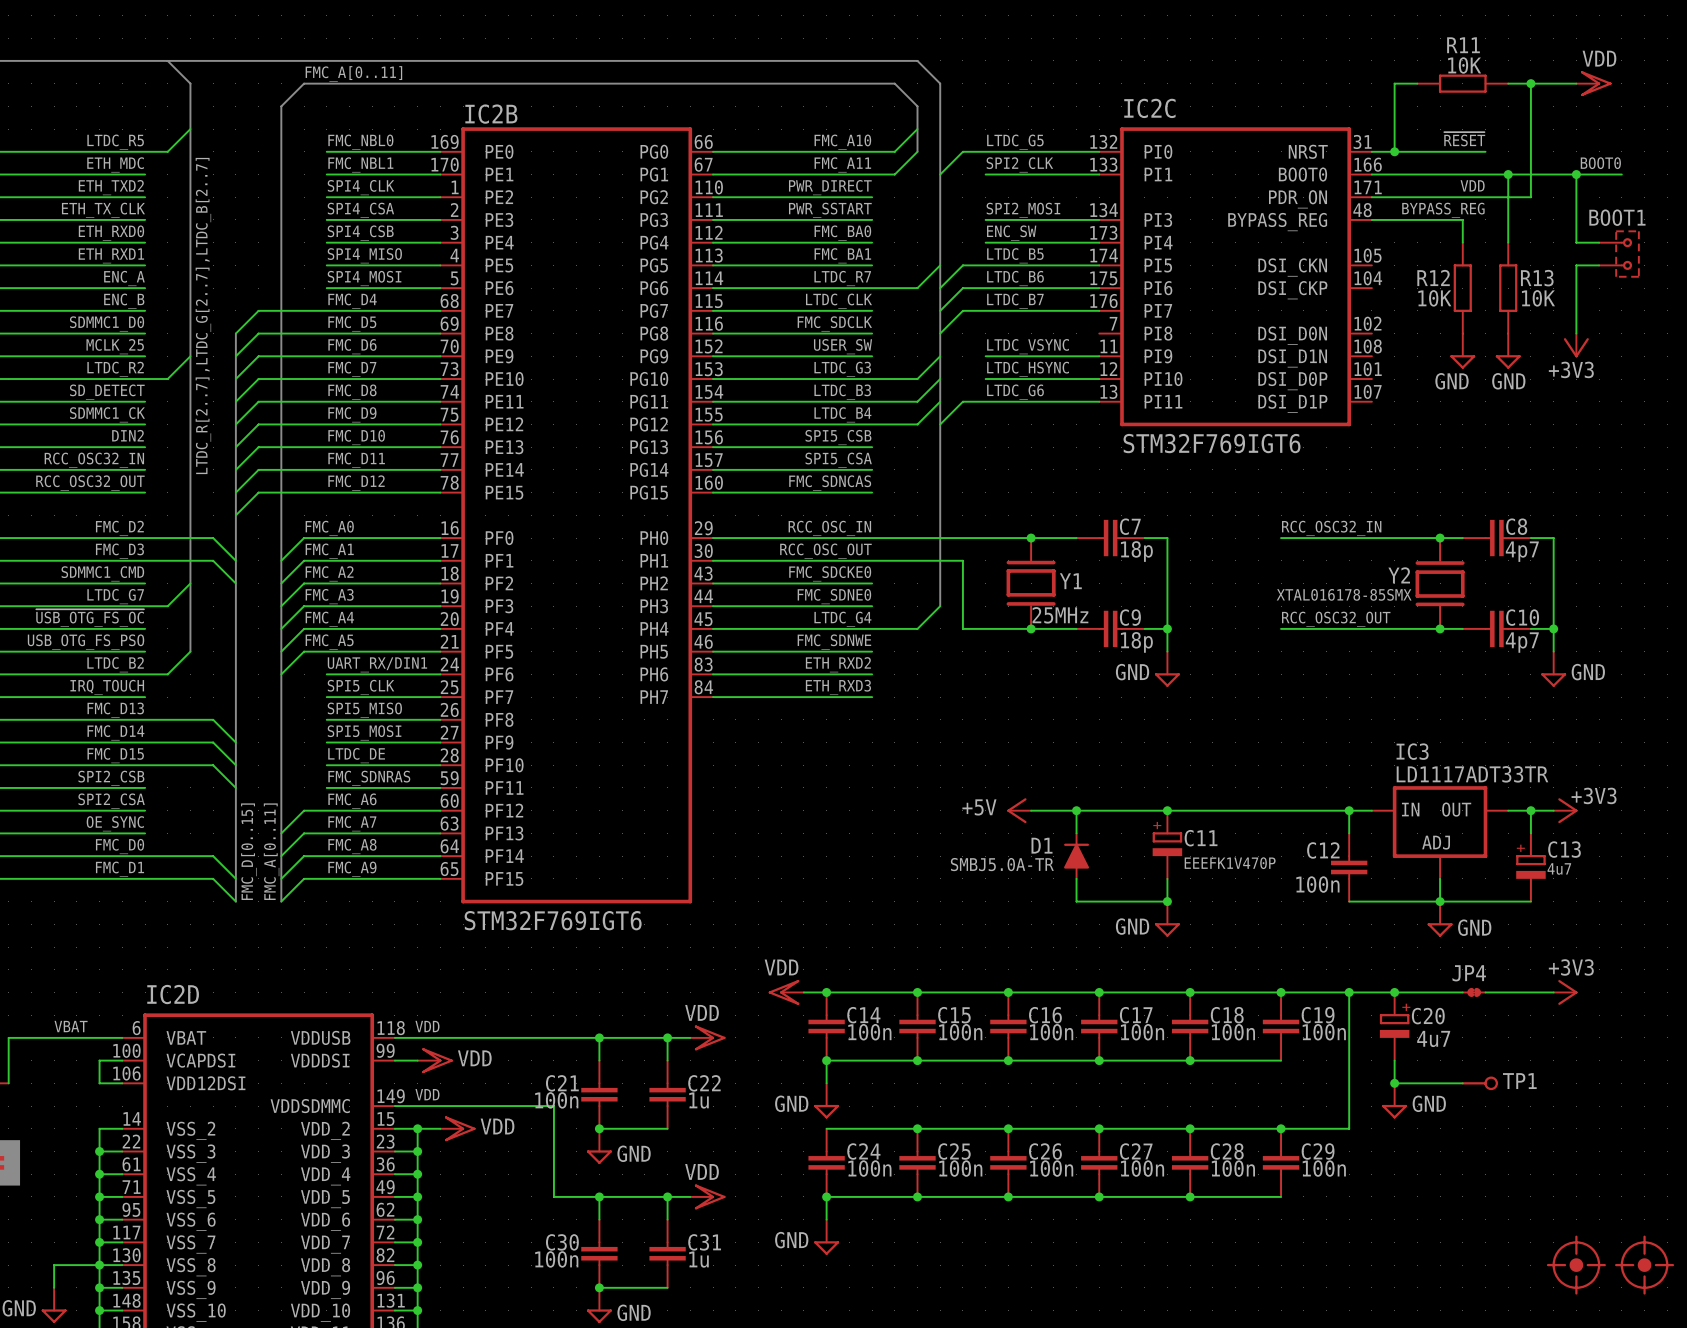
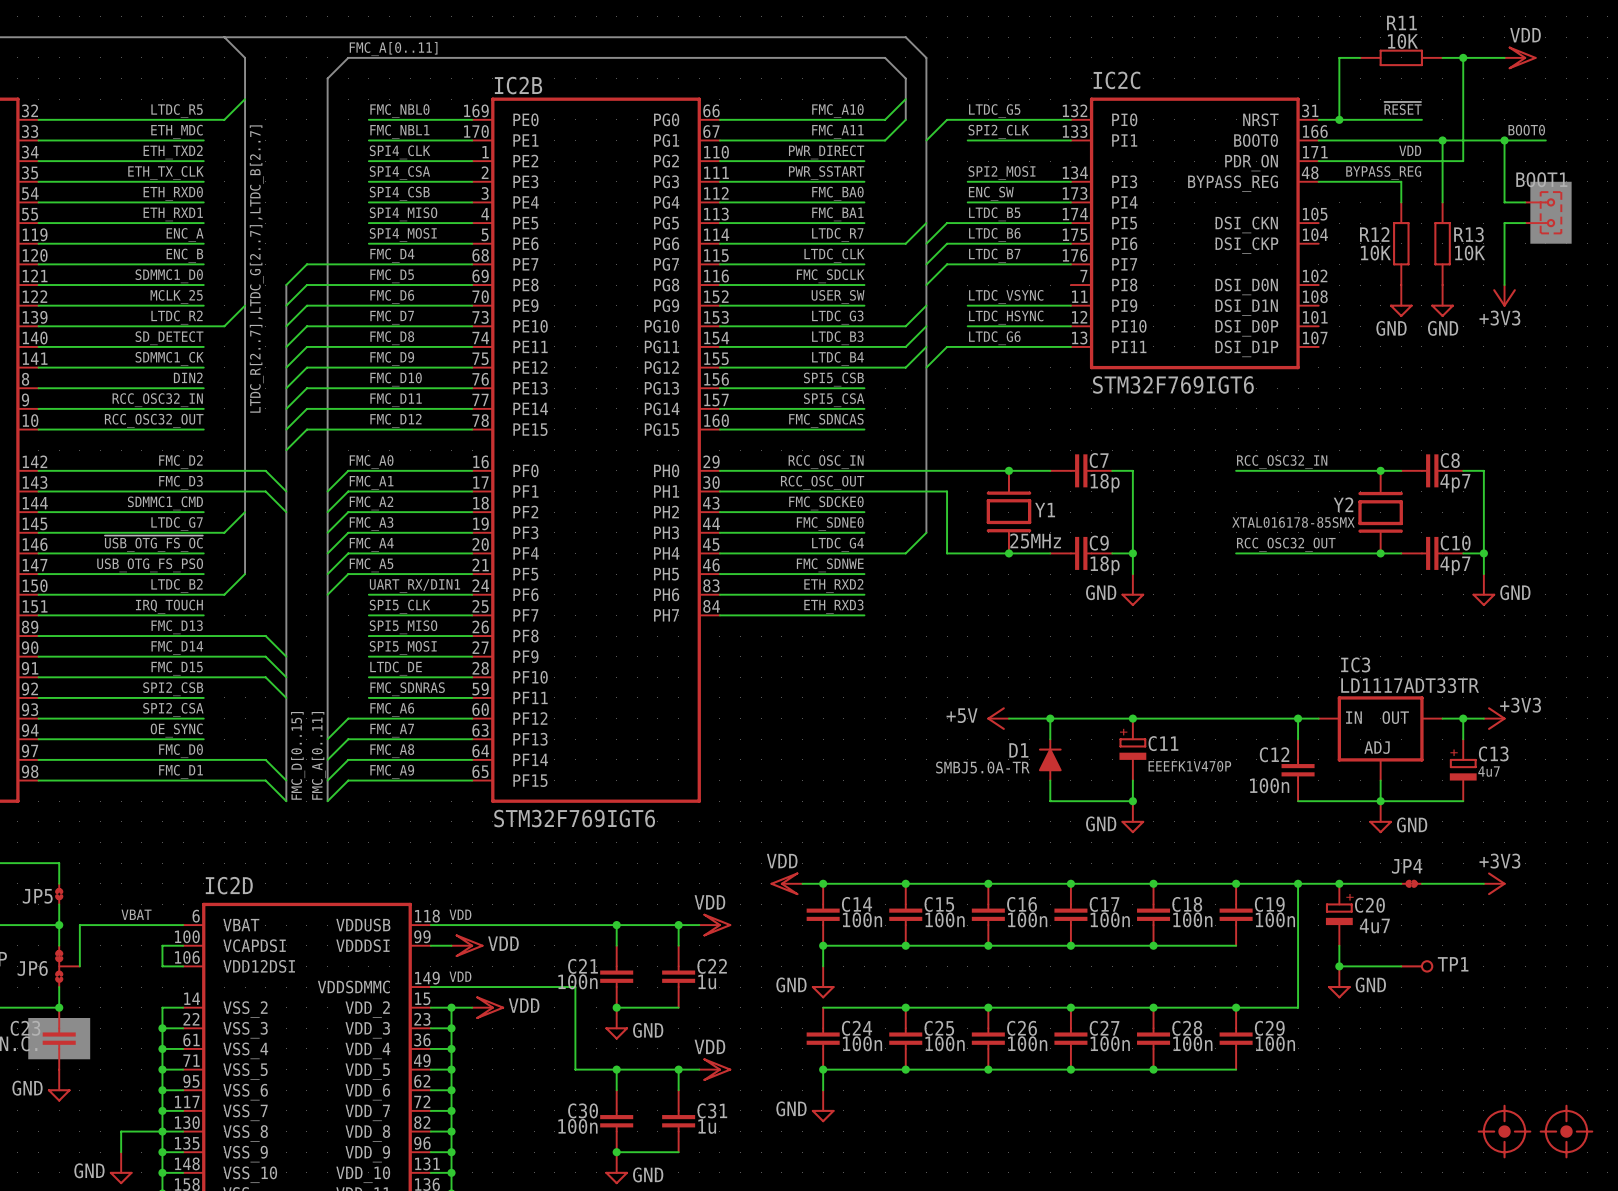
drawing: none -> [1530, 181, 1572, 244]

